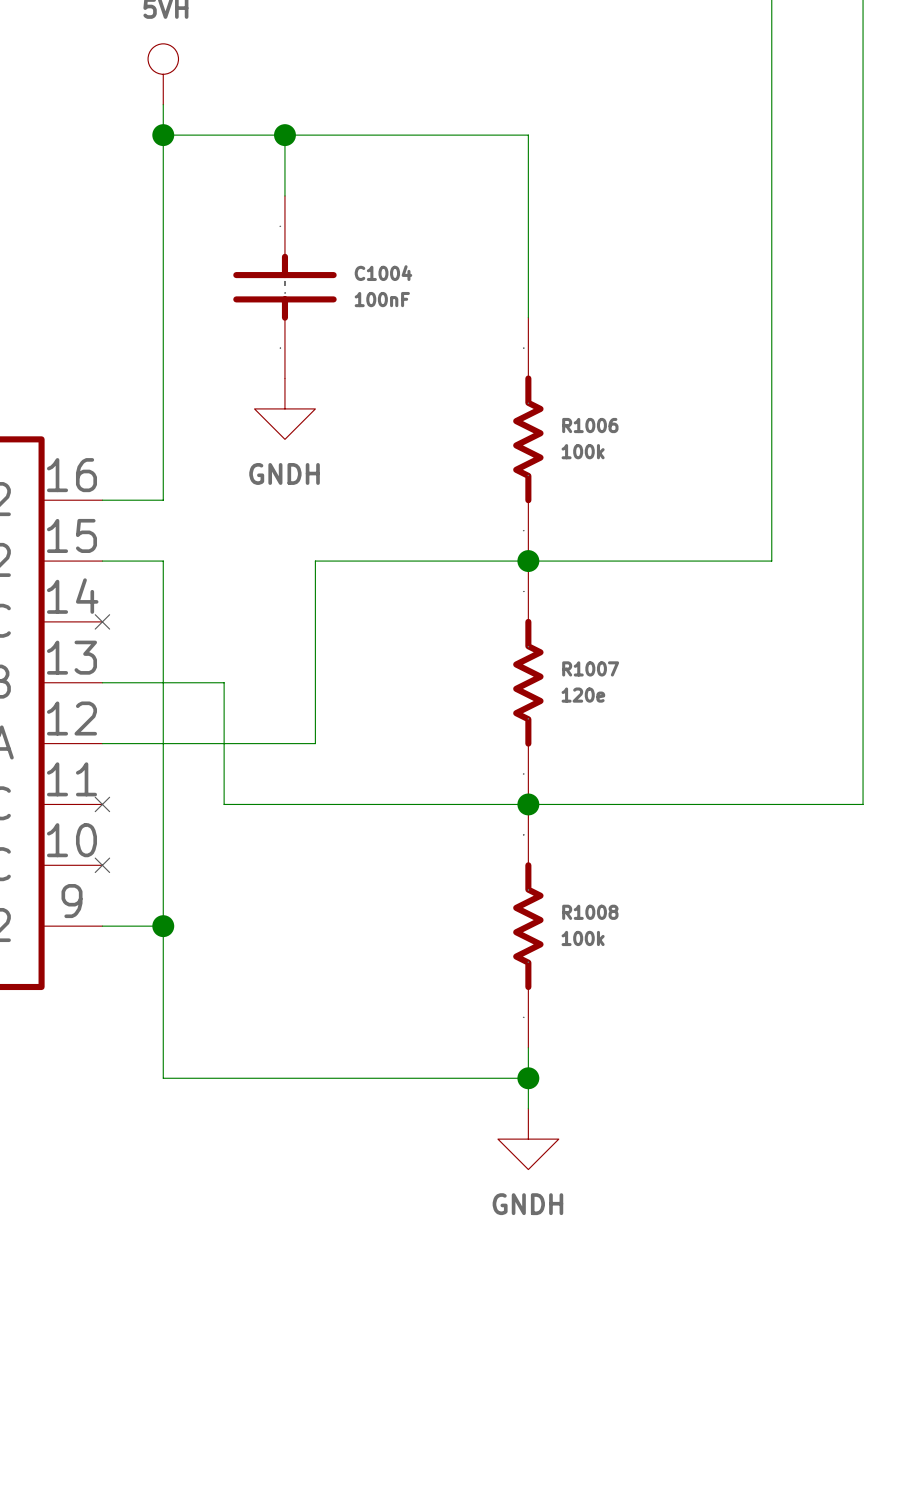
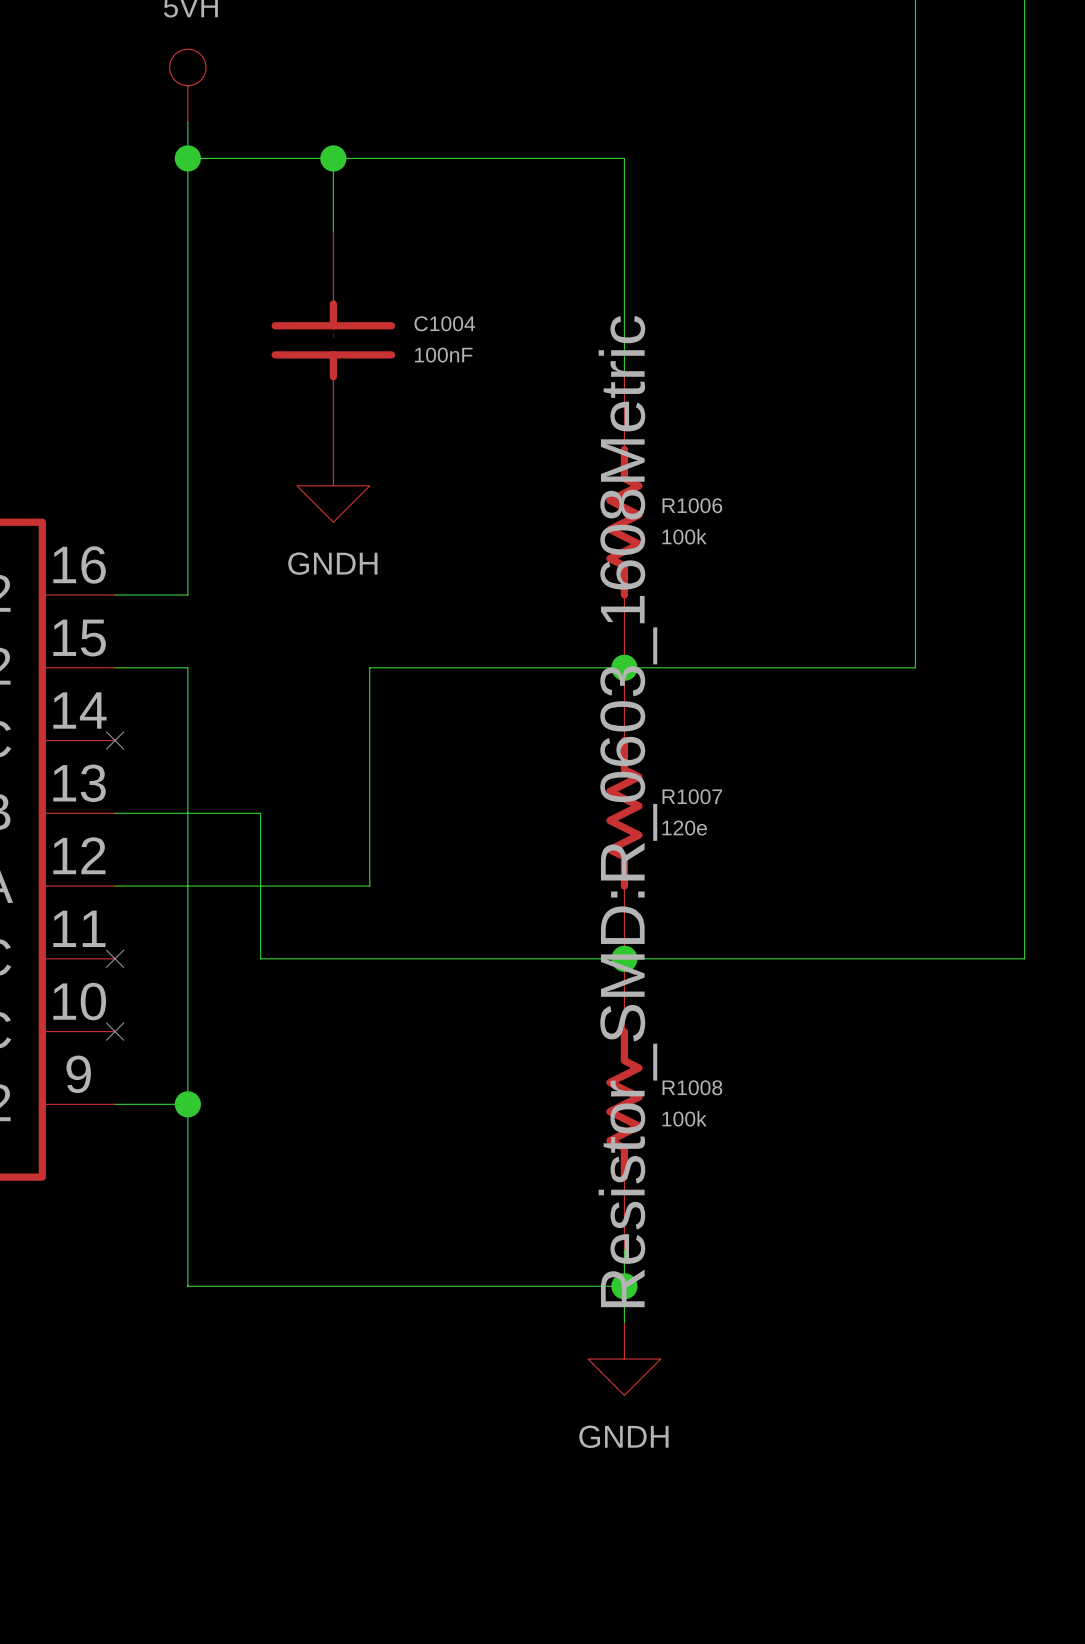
R1007 text: none -> Resistor_SMD:R_0603_1608Metric (627, 811)

